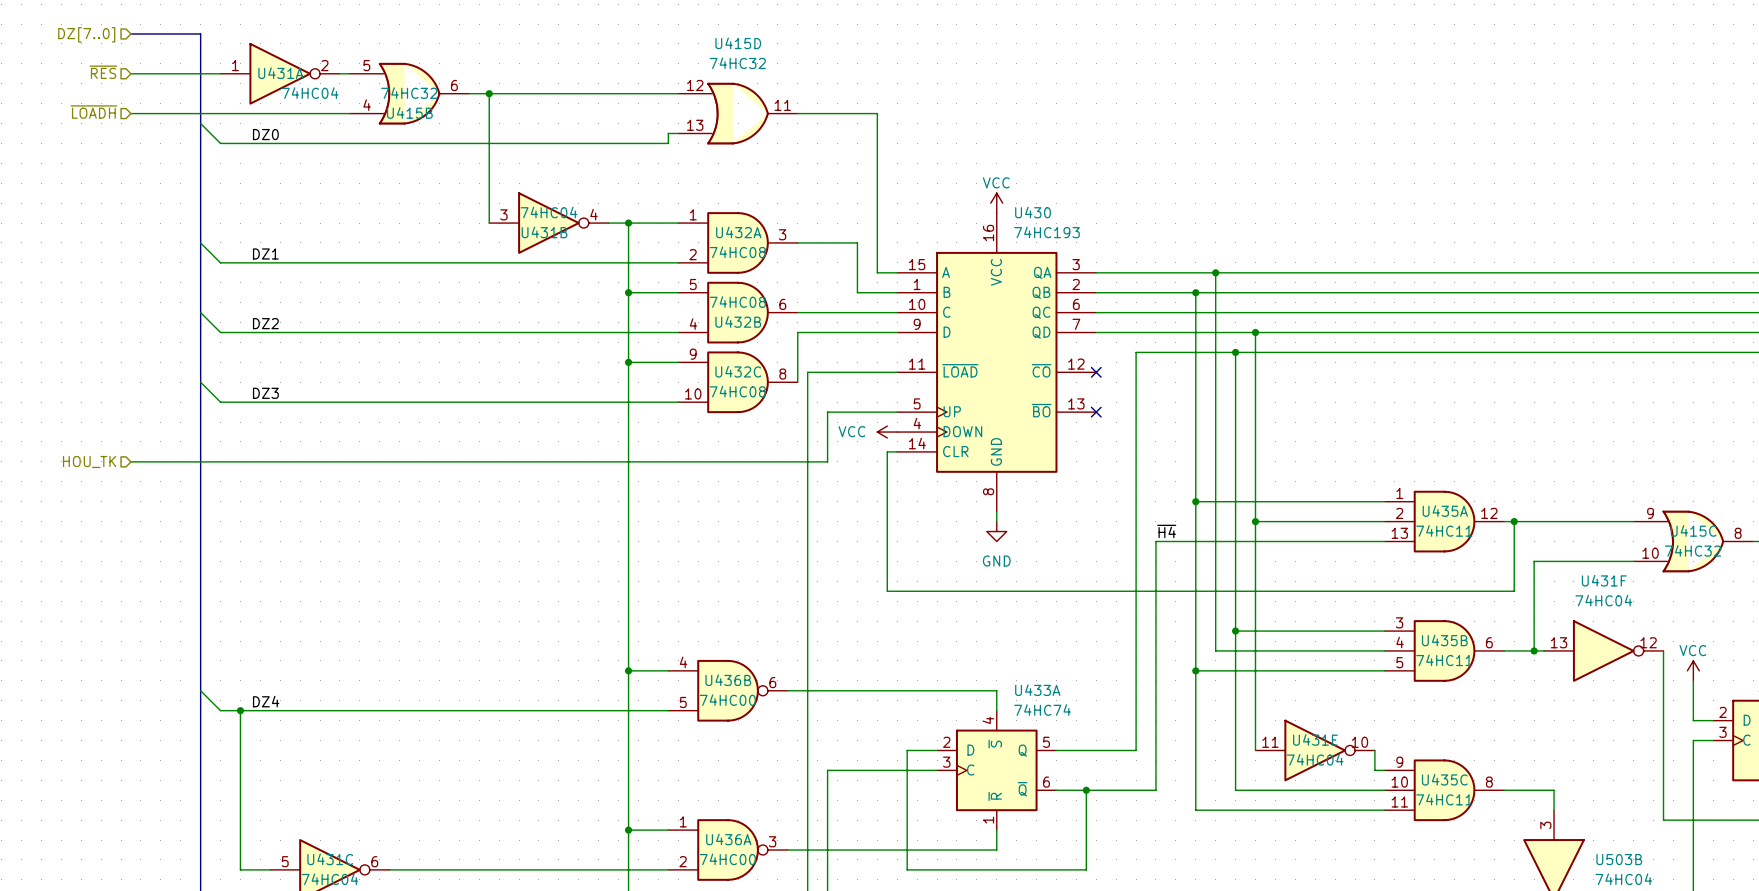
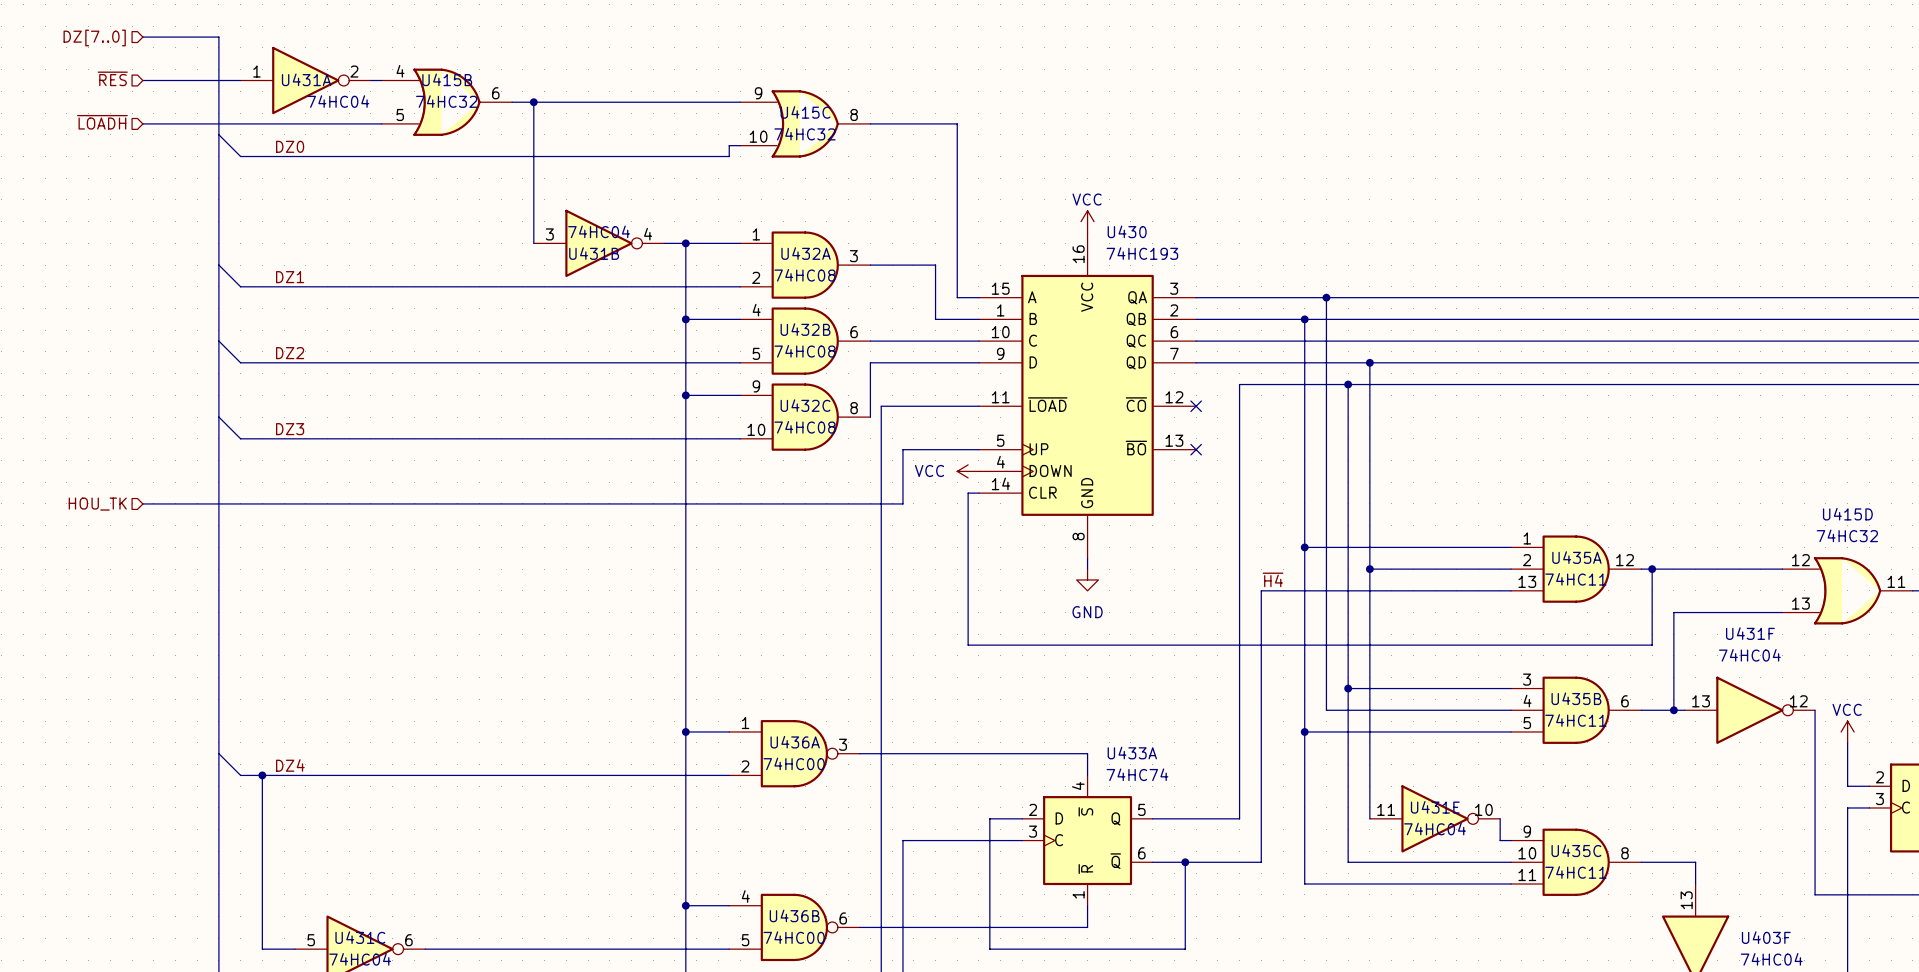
U415B flip: as is (409, 93) -> up-down (446, 102)
U415D position: (738, 113) -> (1847, 590)
U432B flip: as is (738, 312) -> up-down (805, 341)
U415C position: (1693, 541) -> (805, 123)
U436B position: (728, 690) -> (794, 927)
U503B pin number: 3 (1545, 825) -> 13 (1686, 900)
U436A position: (728, 849) -> (794, 753)
U503B name: U503B (1619, 859) -> U403F (1766, 937)

